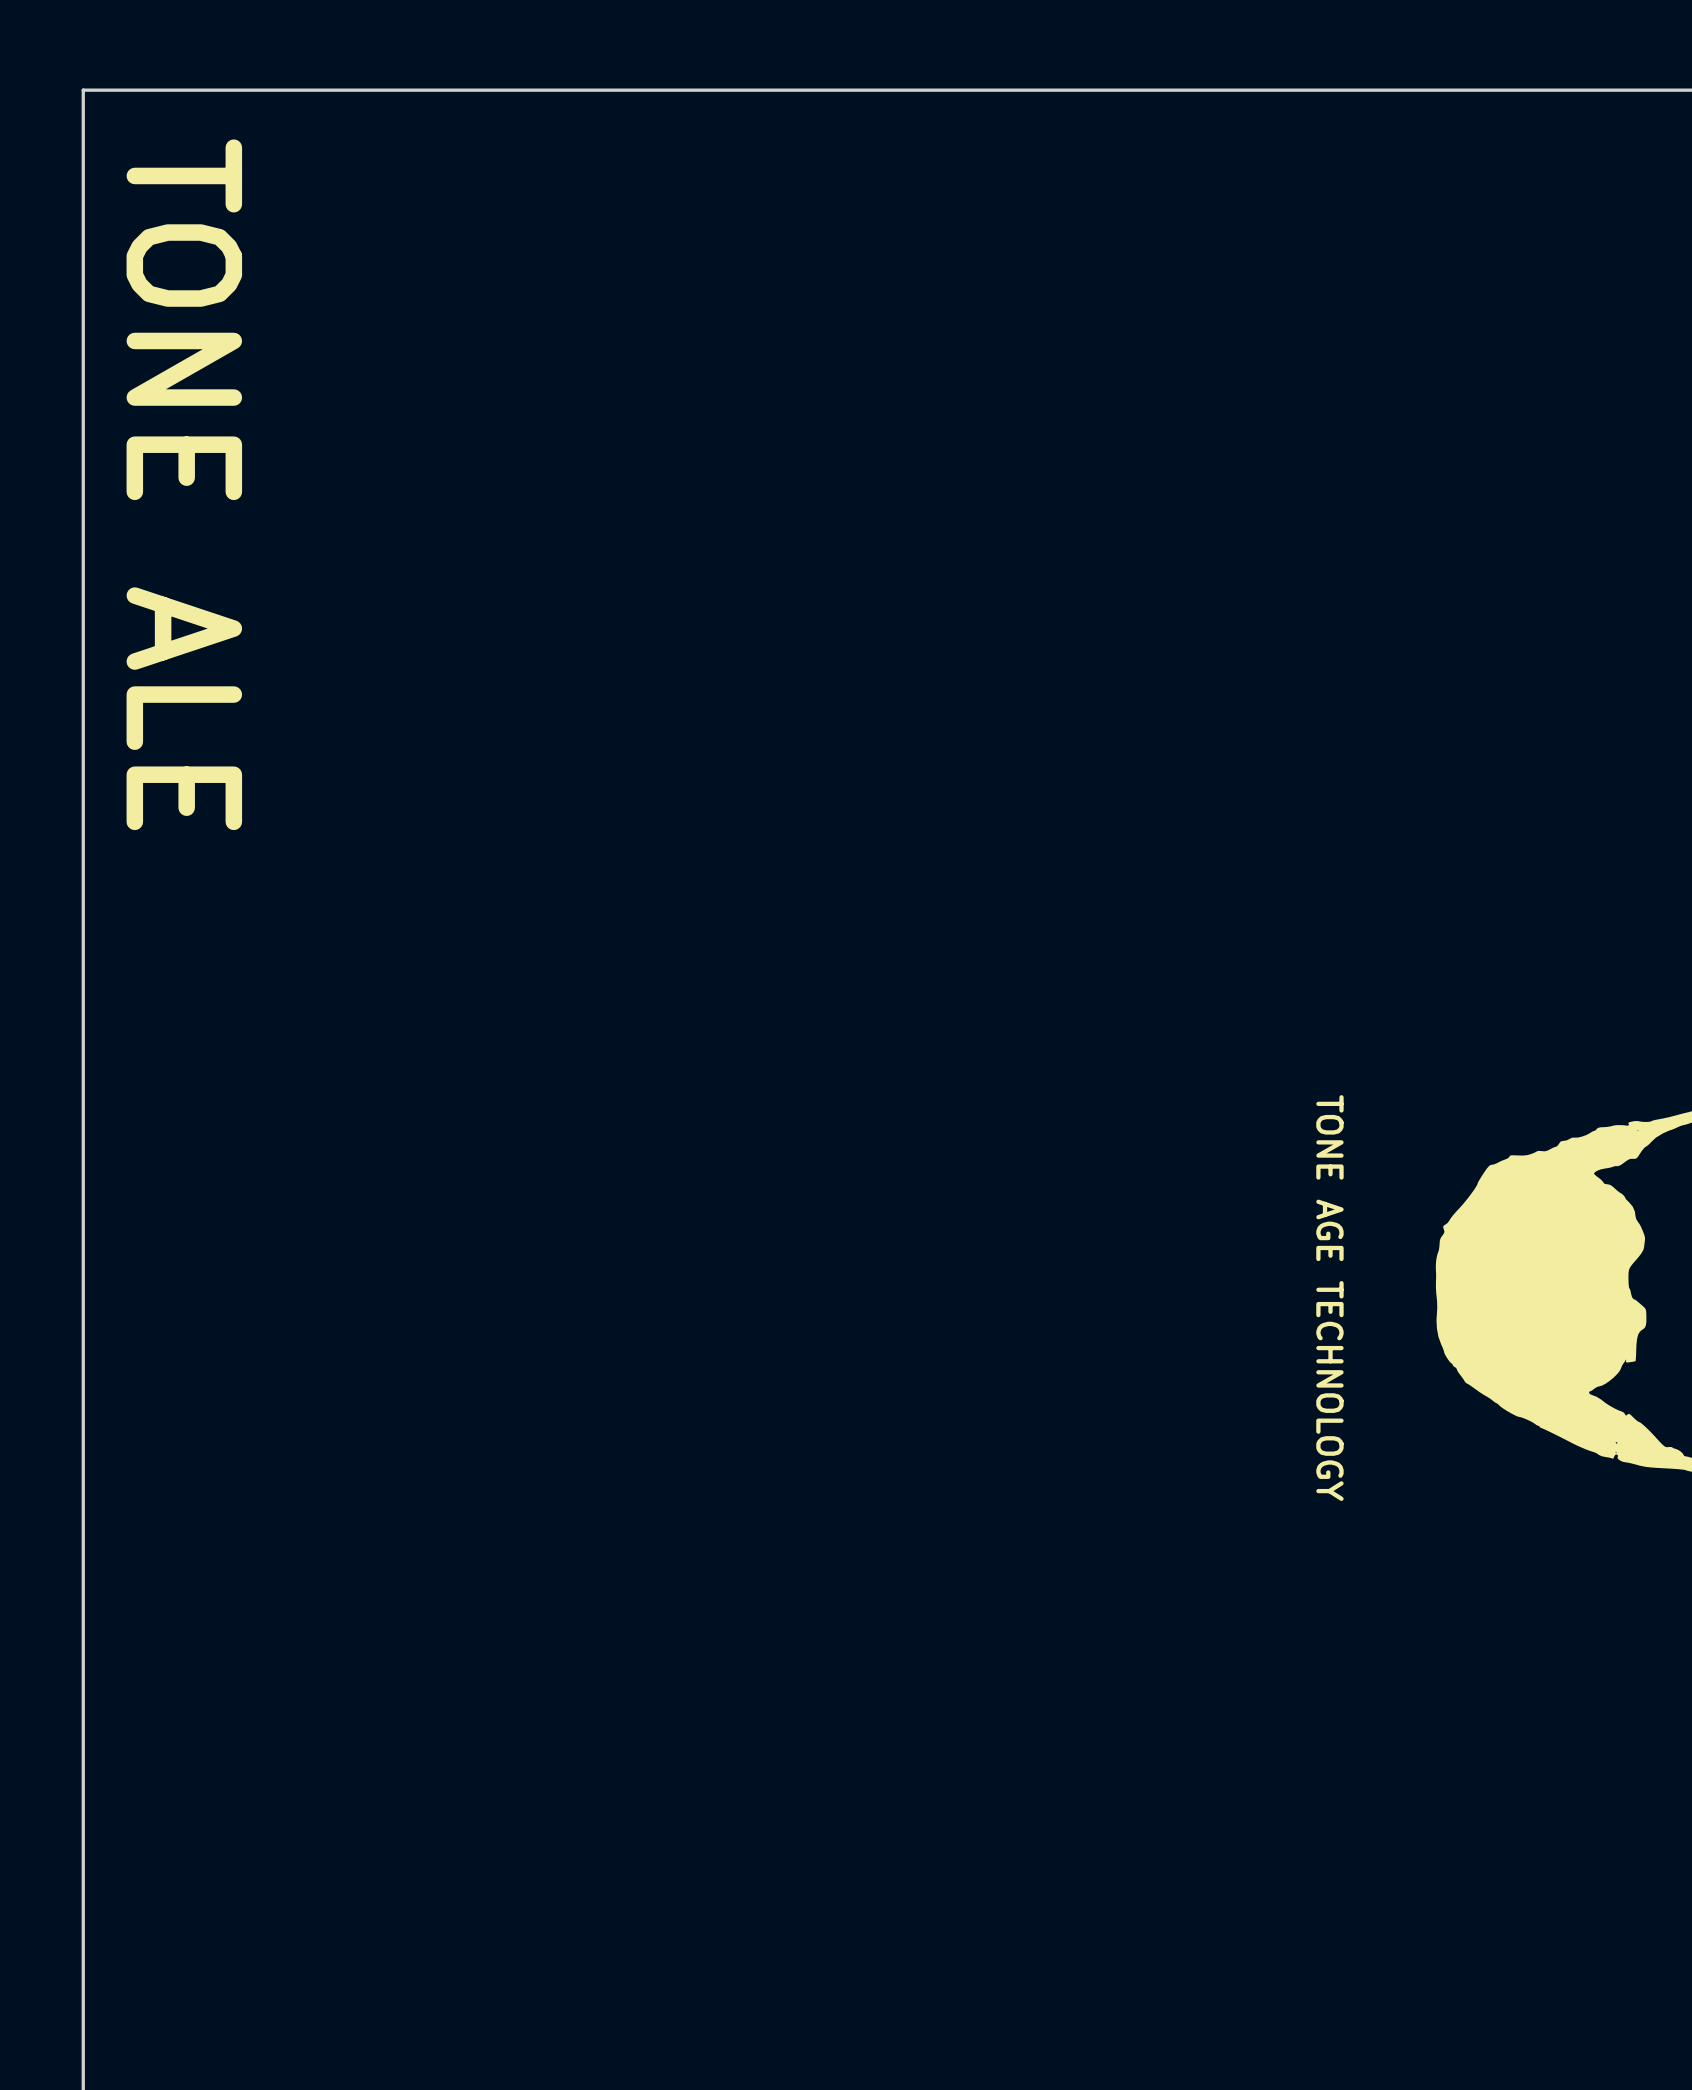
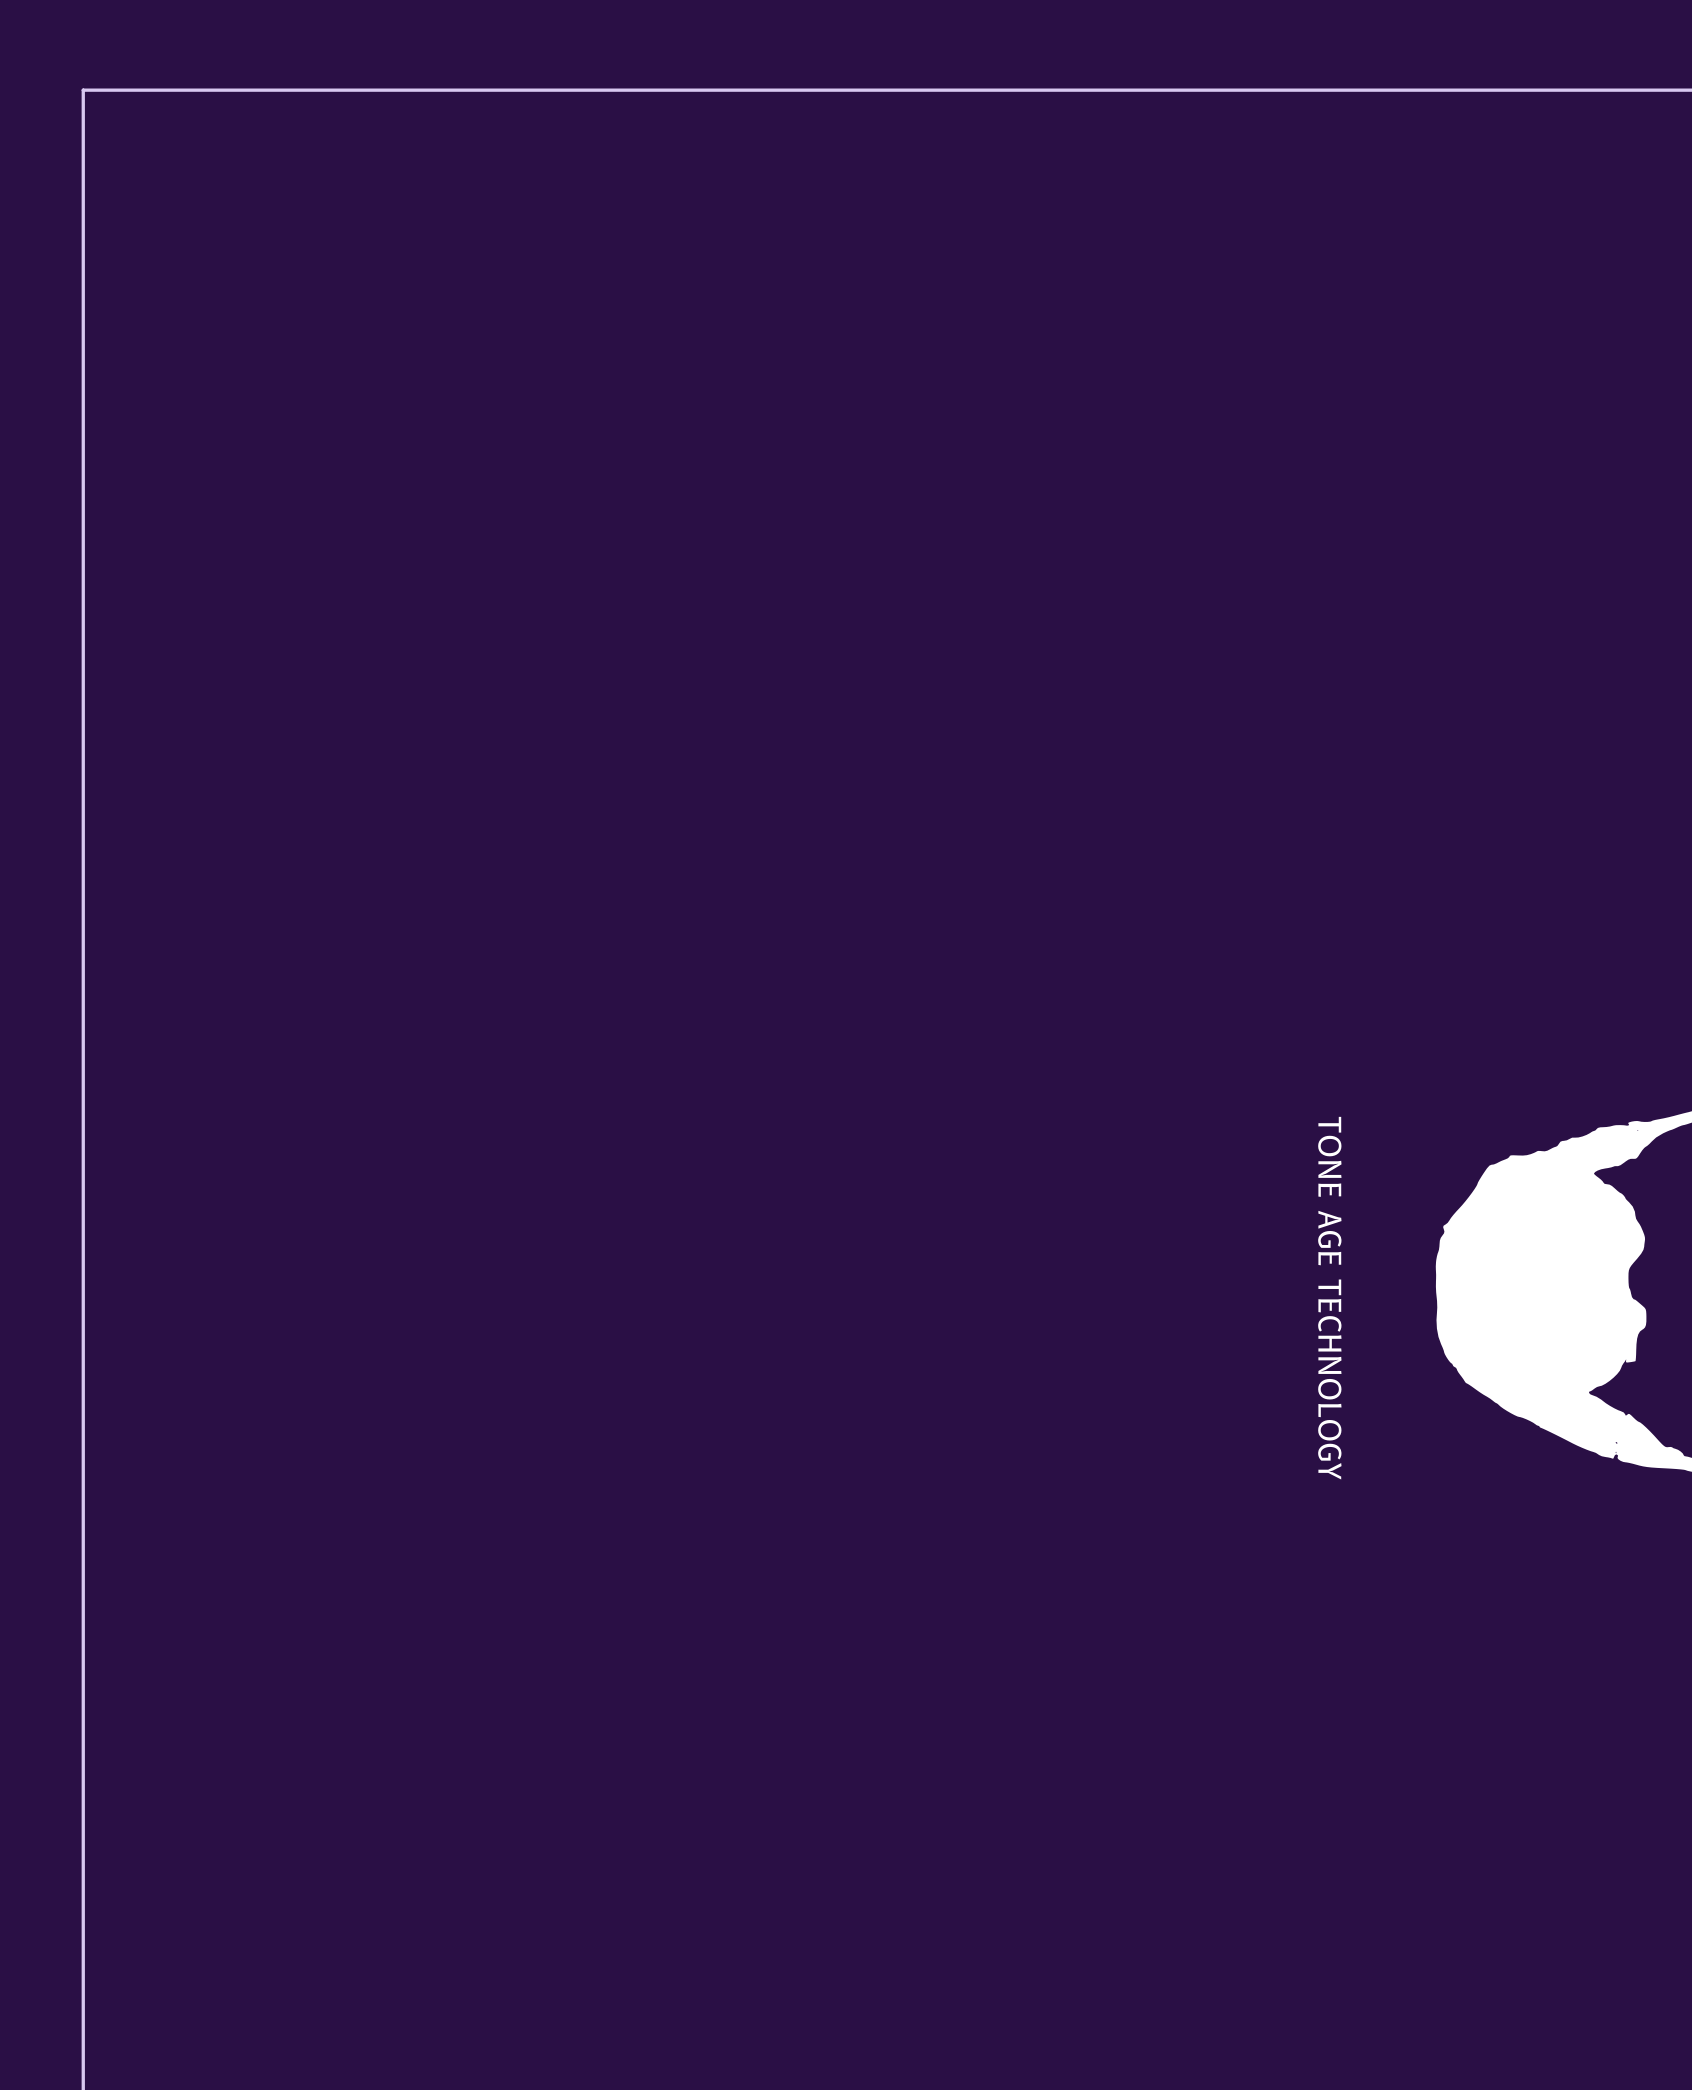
text: TONE ALE (184, 484) -> none

